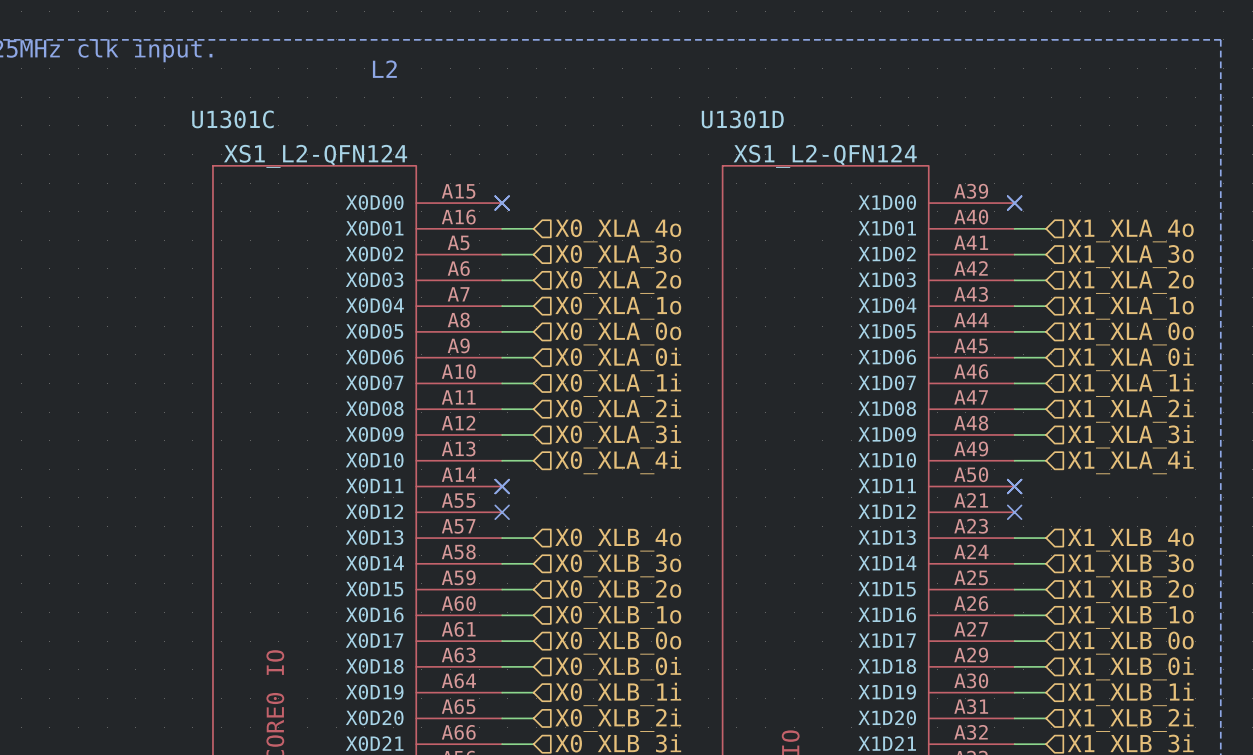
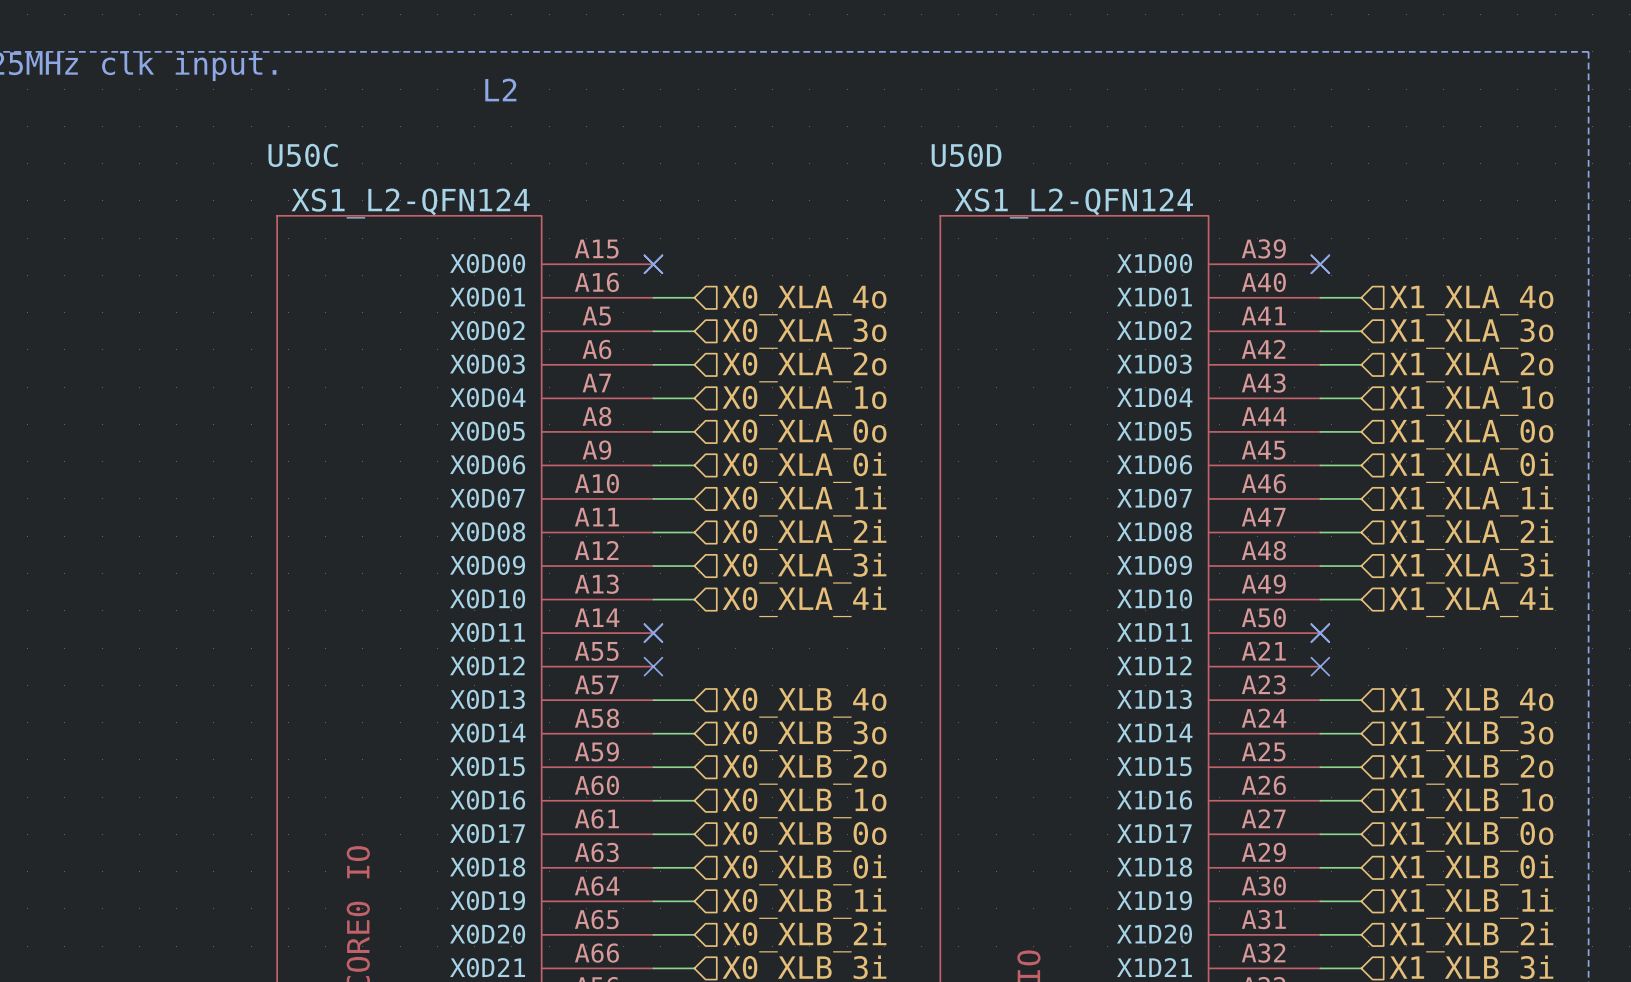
U1301C name: U1301C (232, 119) -> U50C (303, 155)
U1301D name: U1301D (742, 119) -> U50D (966, 155)

